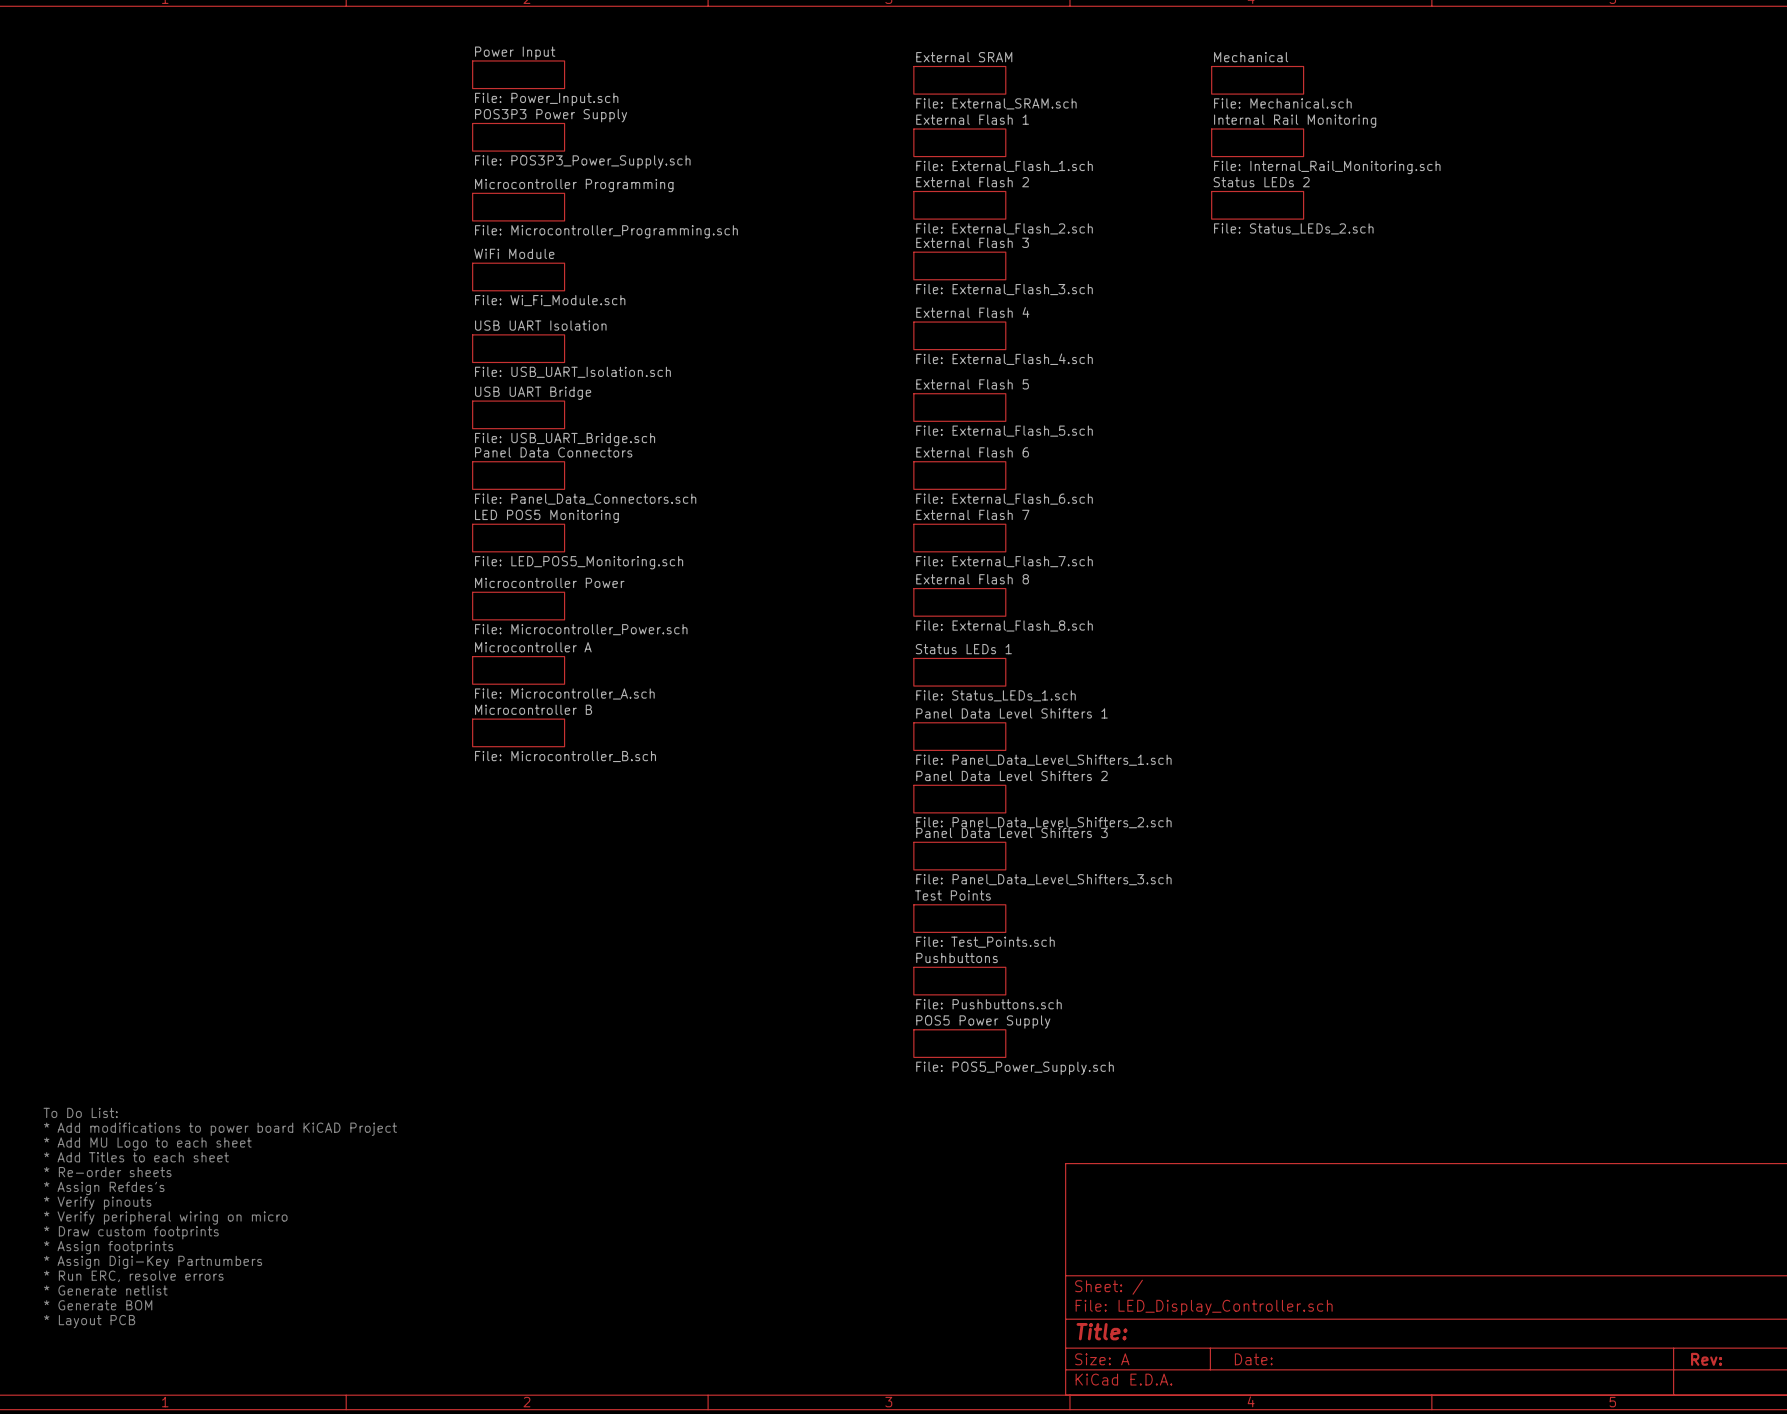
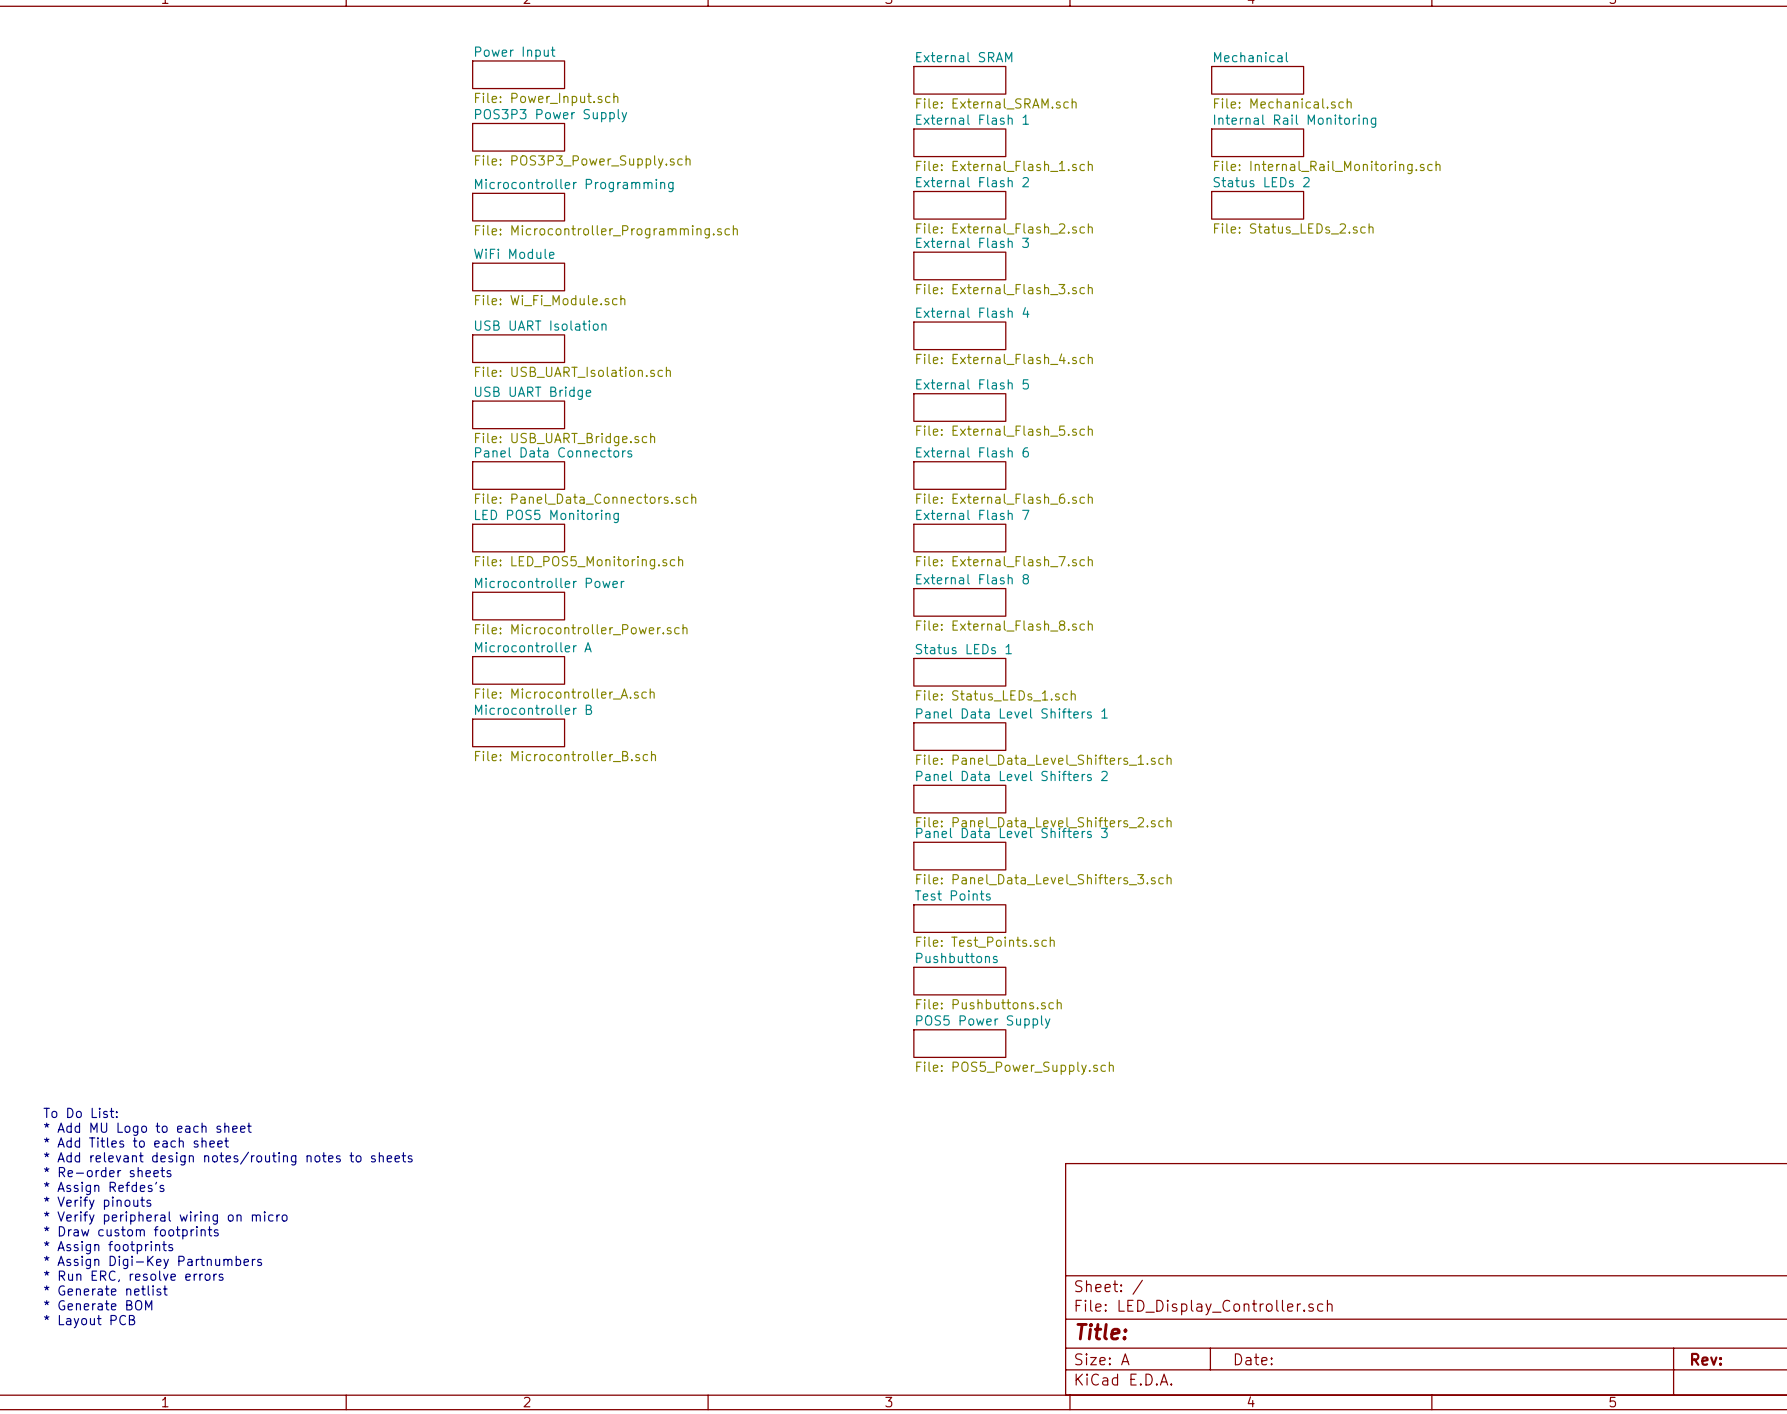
text: * Add modifications to power board KiCAD Project (220, 1129) -> * Add MU Logo to each sheet (147, 1129)
text: * Add MU Logo to each sheet (147, 1144) -> * Add Titles to each sheet (136, 1142)
text: * Add Titles to each sheet (136, 1157) -> * Add relevant design notes/routing notes to sheets (228, 1158)

